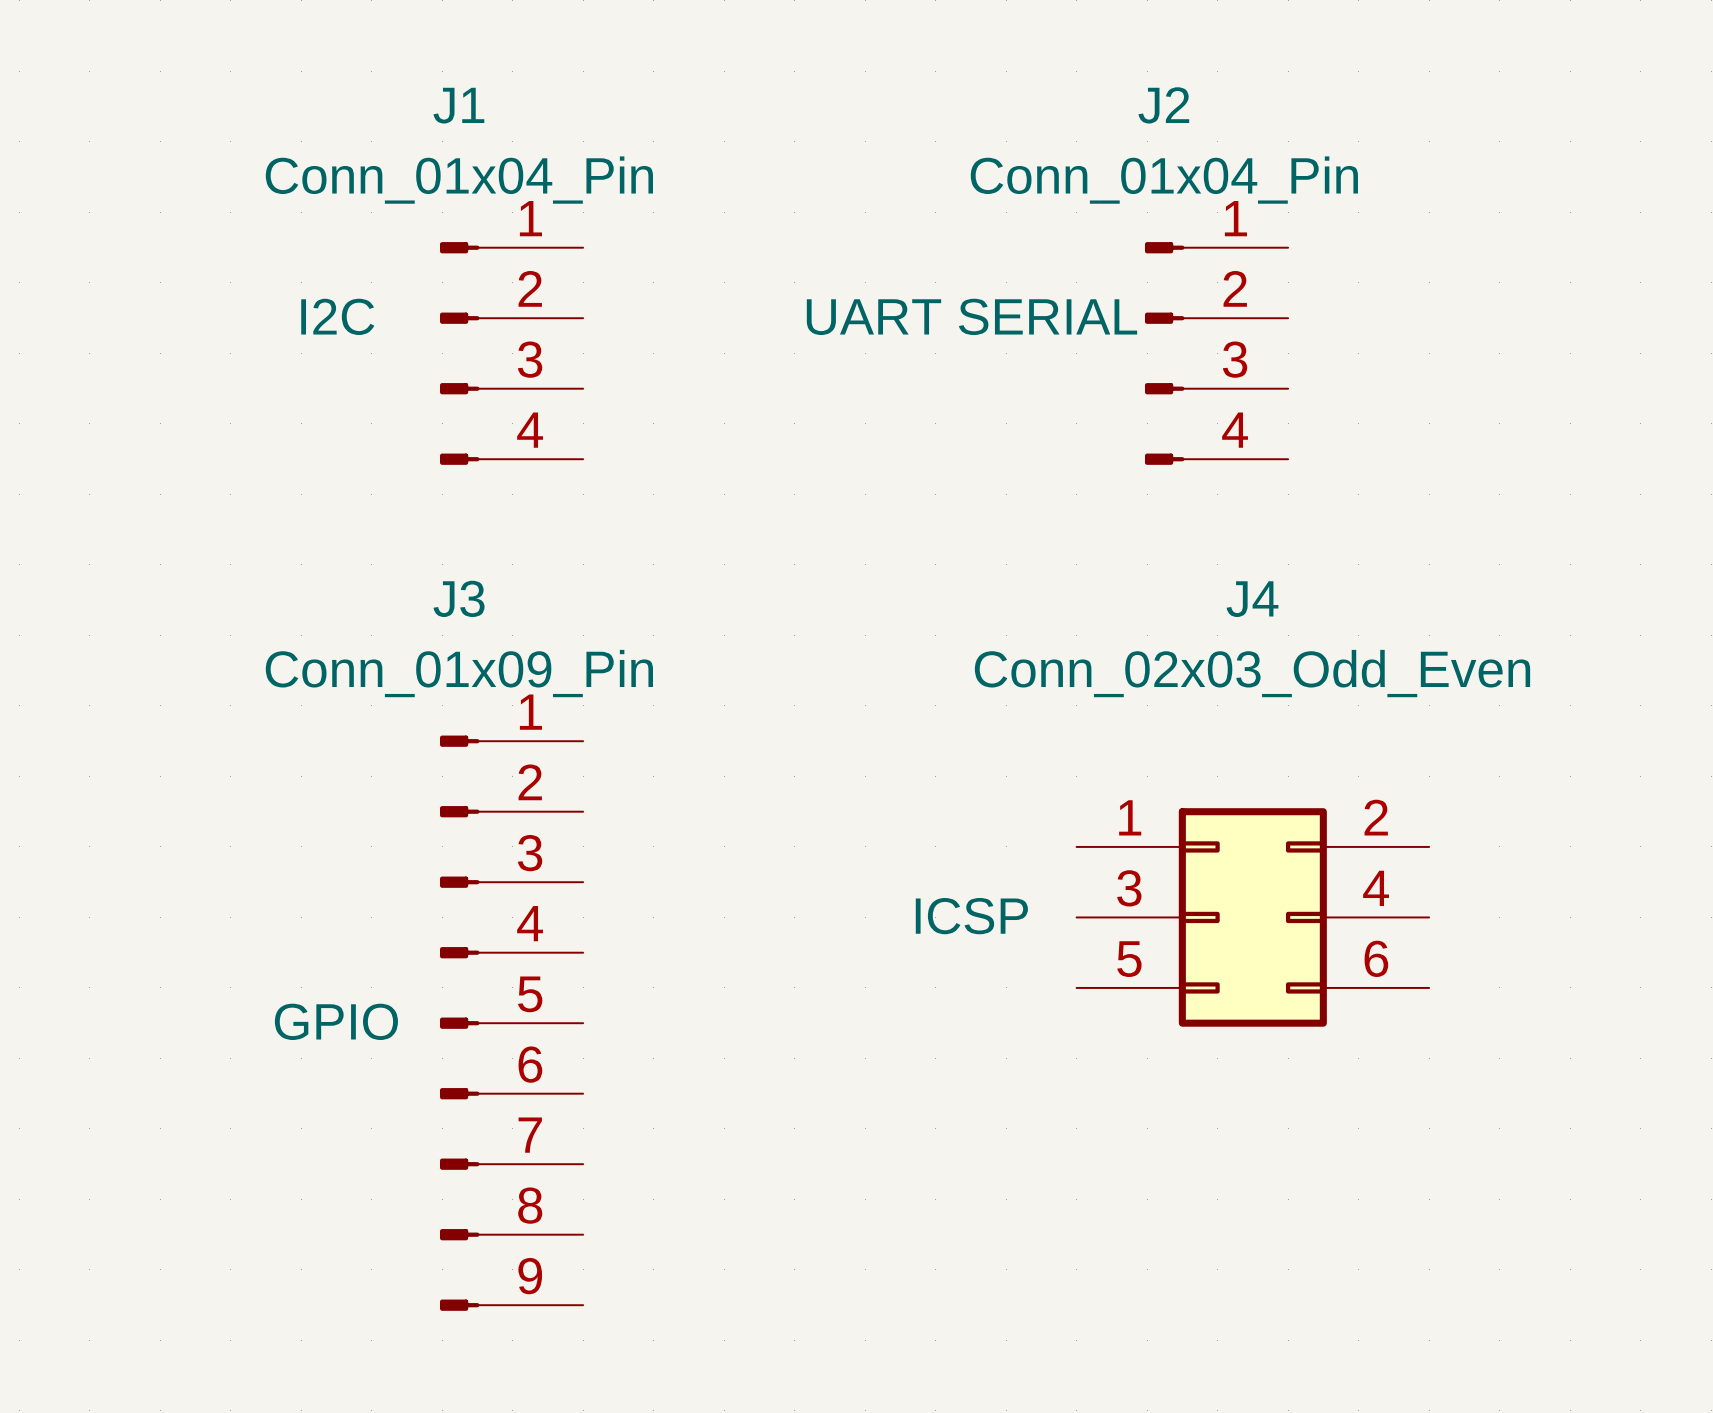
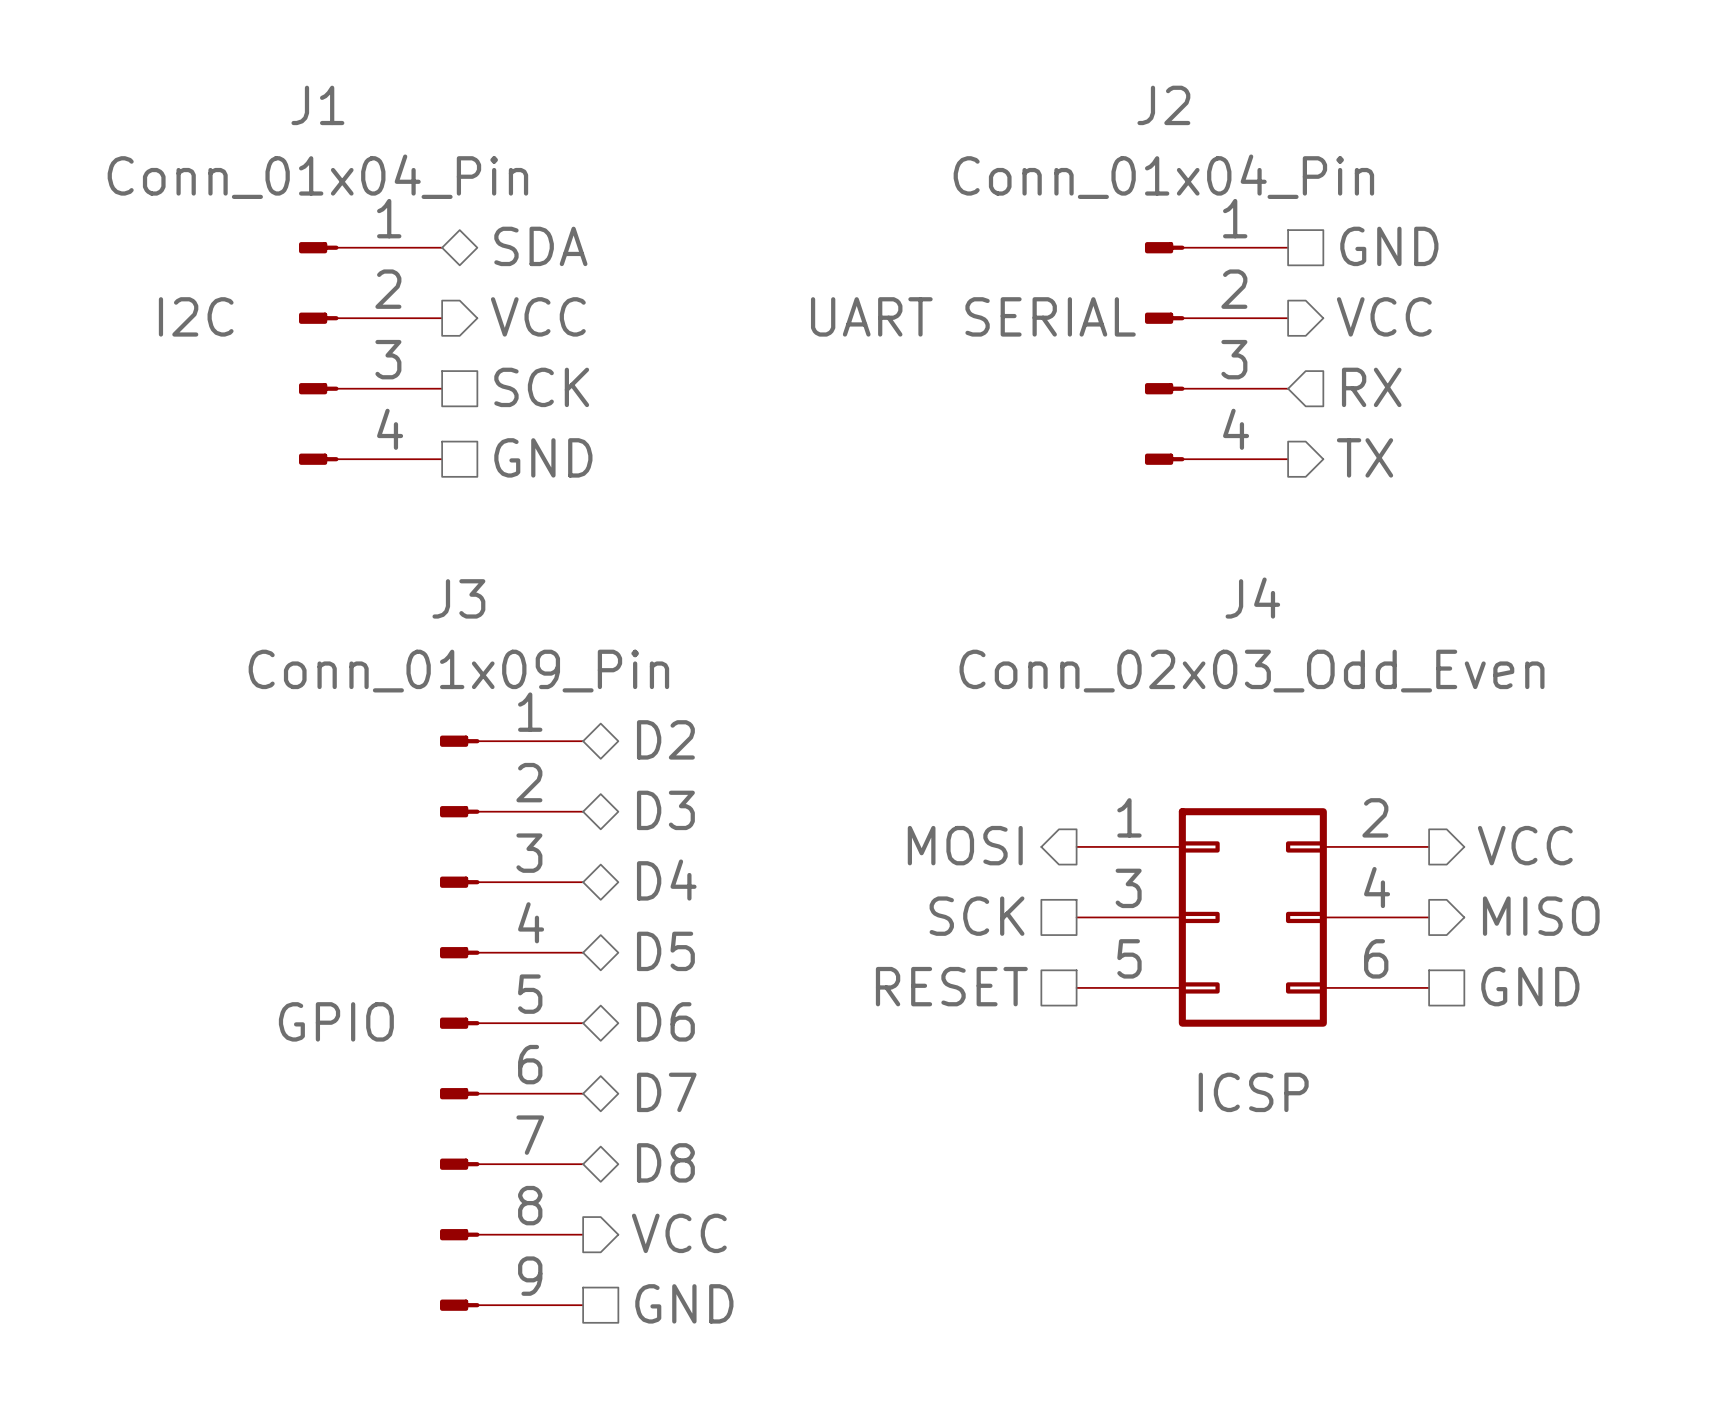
hierarchical label: none -> SDA (540, 246)
hierarchical label: none -> GND (1389, 246)
hierarchical label: none -> VCC (538, 316)
hierarchical label: none -> VCC (1384, 316)
J1 position: (511, 353) -> (370, 353)
hierarchical label: none -> SCK (541, 387)
hierarchical label: none -> RX (1371, 387)
hierarchical label: none -> GND (543, 457)
hierarchical label: none -> TX (1365, 457)
hierarchical label: none -> D2 (665, 739)
hierarchical label: none -> D3 (665, 810)
hierarchical label: none -> MOSI (965, 845)
hierarchical label: none -> VCC (1525, 845)
hierarchical label: none -> D4 (666, 880)
J4 text position: ICSP (971, 916) -> ICSP (1253, 1092)
hierarchical label: none -> SCK (977, 916)
hierarchical label: none -> MISO (1541, 916)
hierarchical label: none -> D5 (665, 951)
hierarchical label: none -> RESET (951, 986)
hierarchical label: none -> GND (1530, 986)
hierarchical label: none -> D6 (665, 1021)
hierarchical label: none -> D7 (666, 1092)
hierarchical label: none -> D8 (665, 1162)
hierarchical label: none -> VCC (679, 1233)
hierarchical label: none -> GND (684, 1303)

